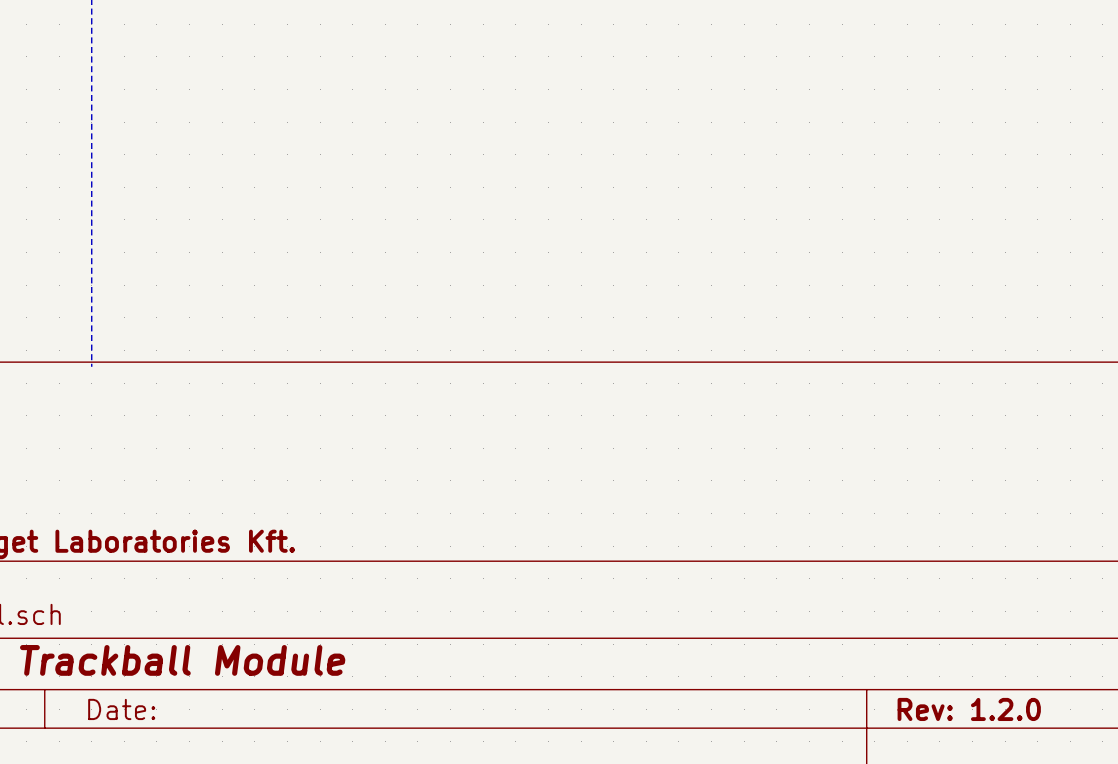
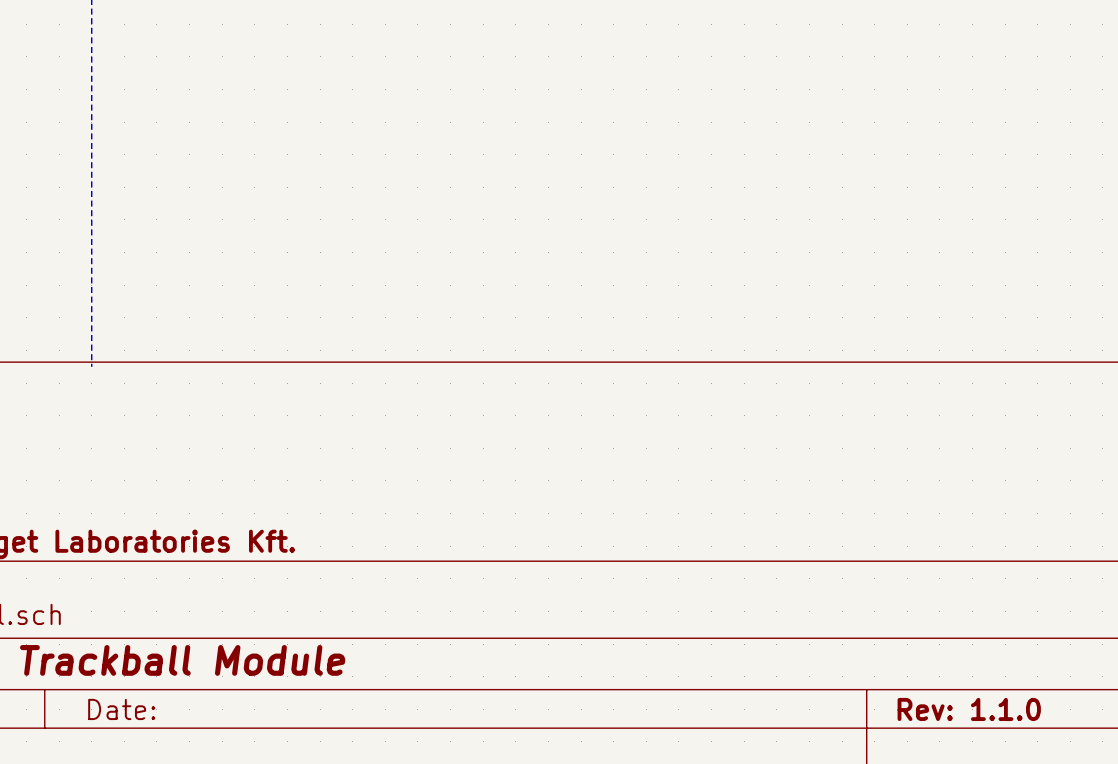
title block: Rev: 1.2.0 (969, 709) -> Rev: 1.1.0 (969, 709)

